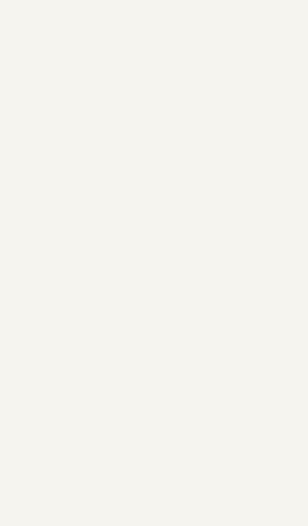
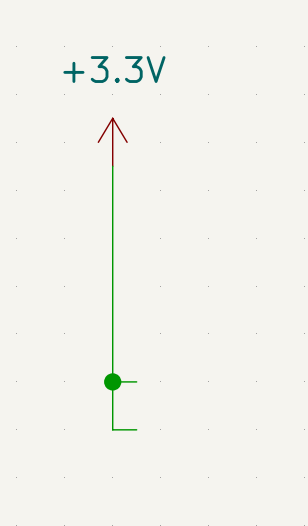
power symbol: none -> +3.3V (112, 142)
wire: none -> (112, 166) (112, 429) (136, 429)
wire: none -> (112, 381) (136, 381)
junction: none -> (112, 381)

